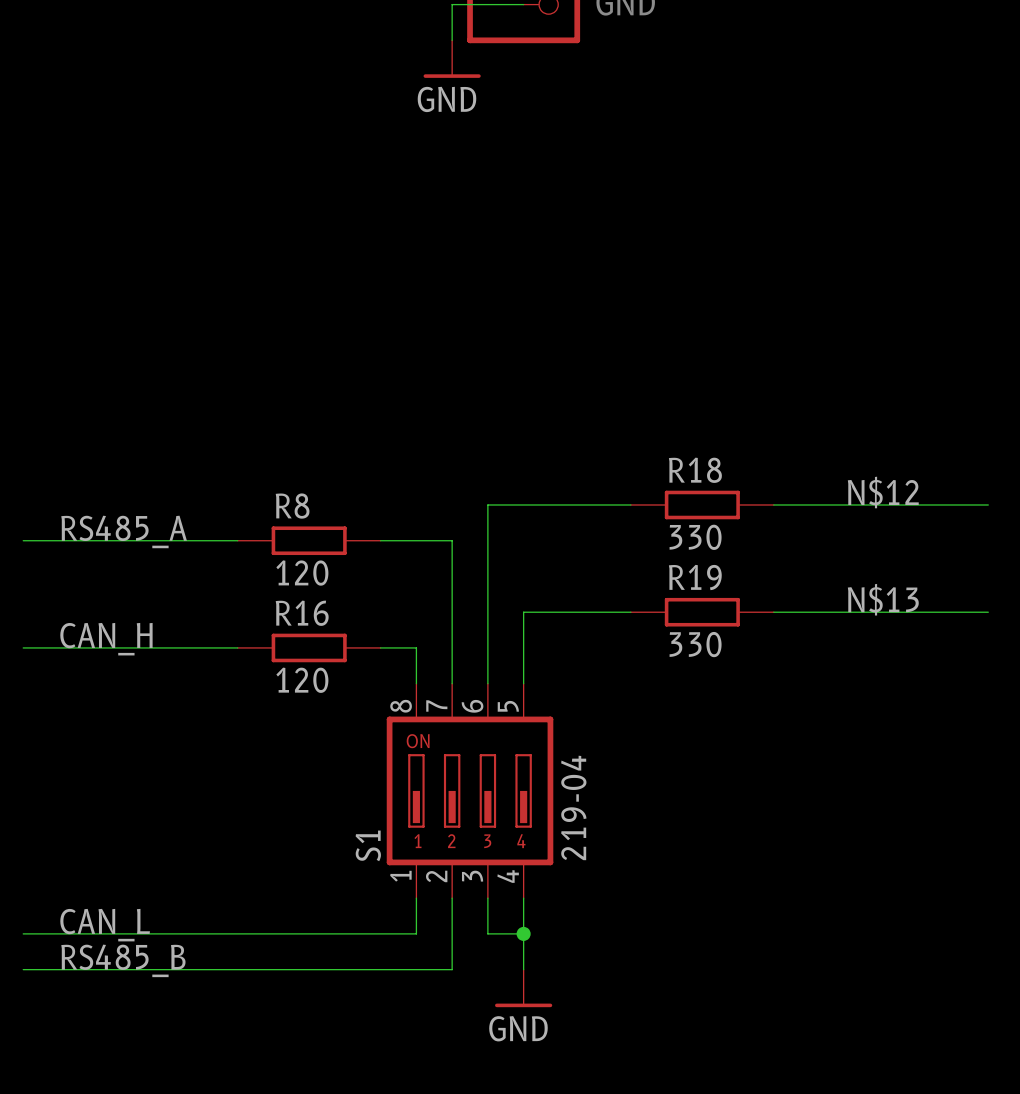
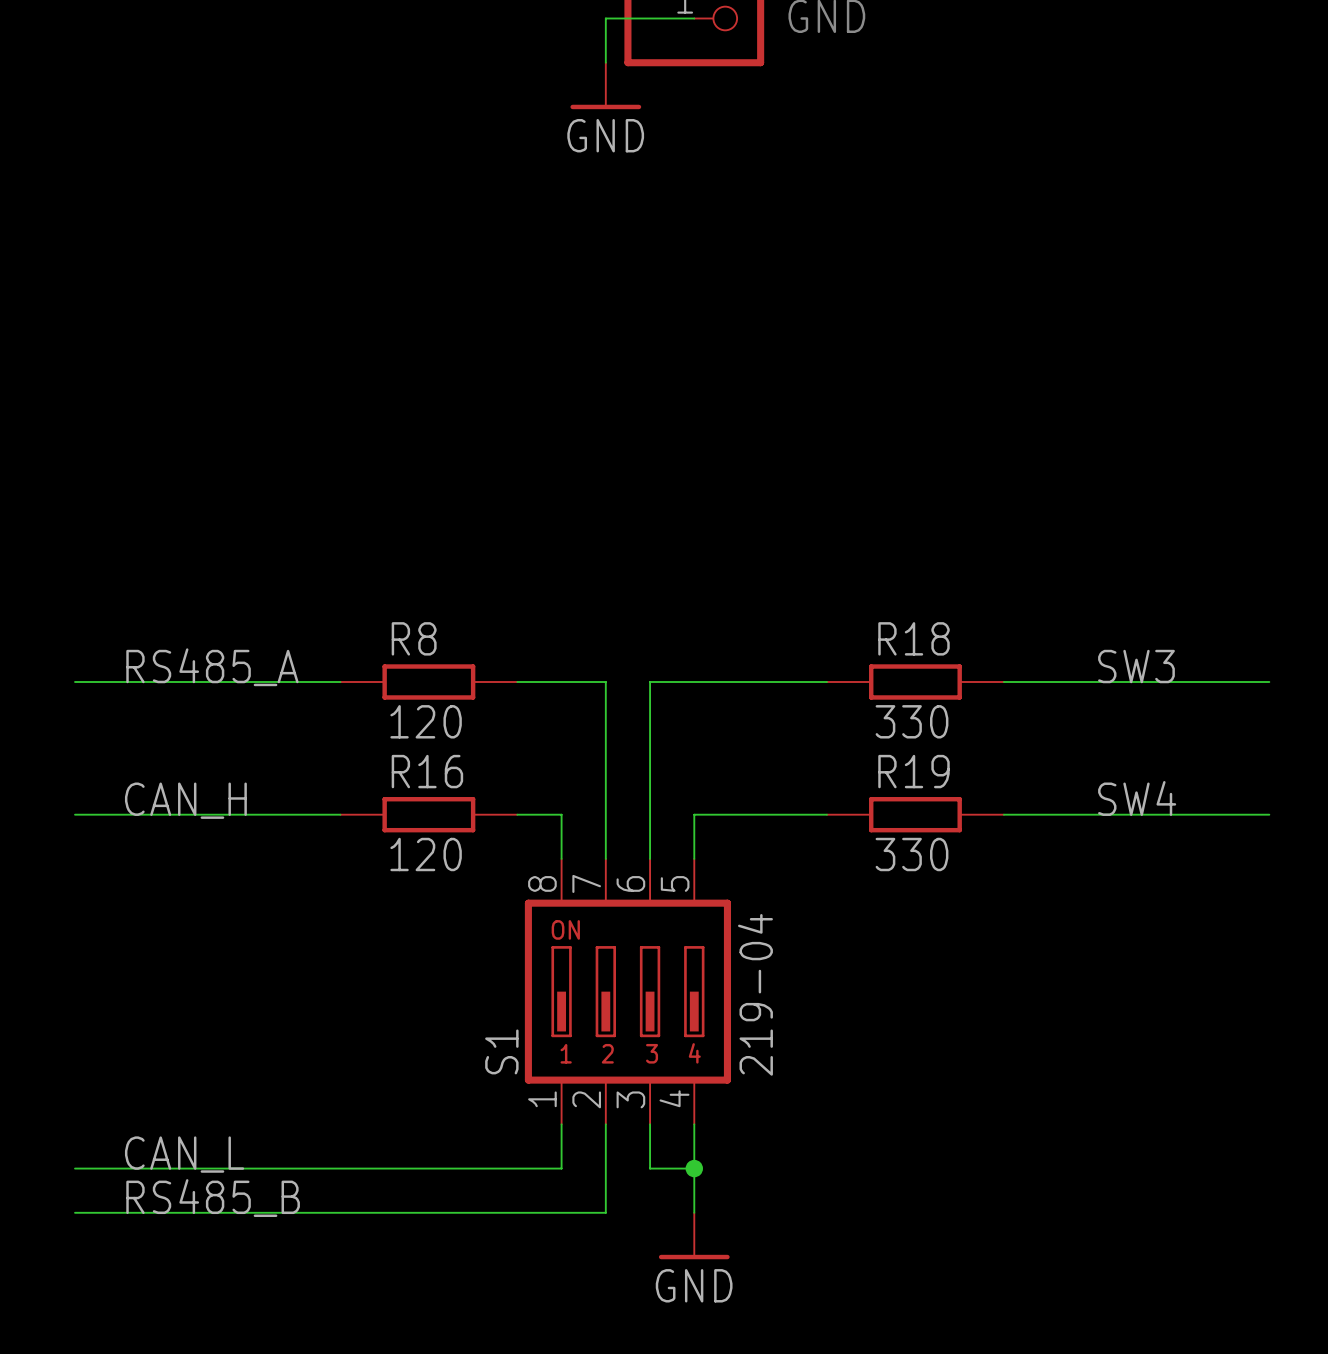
label: N$12 (883, 492) -> none
wire: (630, 504) (487, 504) (487, 540) -> (826, 682) (650, 682)
R18 position: (702, 504) -> (915, 682)
wire: (773, 504) (988, 504) -> (1003, 682) (1269, 682)
label: none -> SW3 (1136, 666)
label: N$13 (883, 599) -> none
wire: (630, 612) (523, 612) (523, 647) -> (826, 814) (694, 814)
R19 position: (702, 612) -> (915, 814)
wire: (773, 612) (988, 612) -> (1003, 814) (1269, 814)
label: none -> SW4 (1137, 798)

